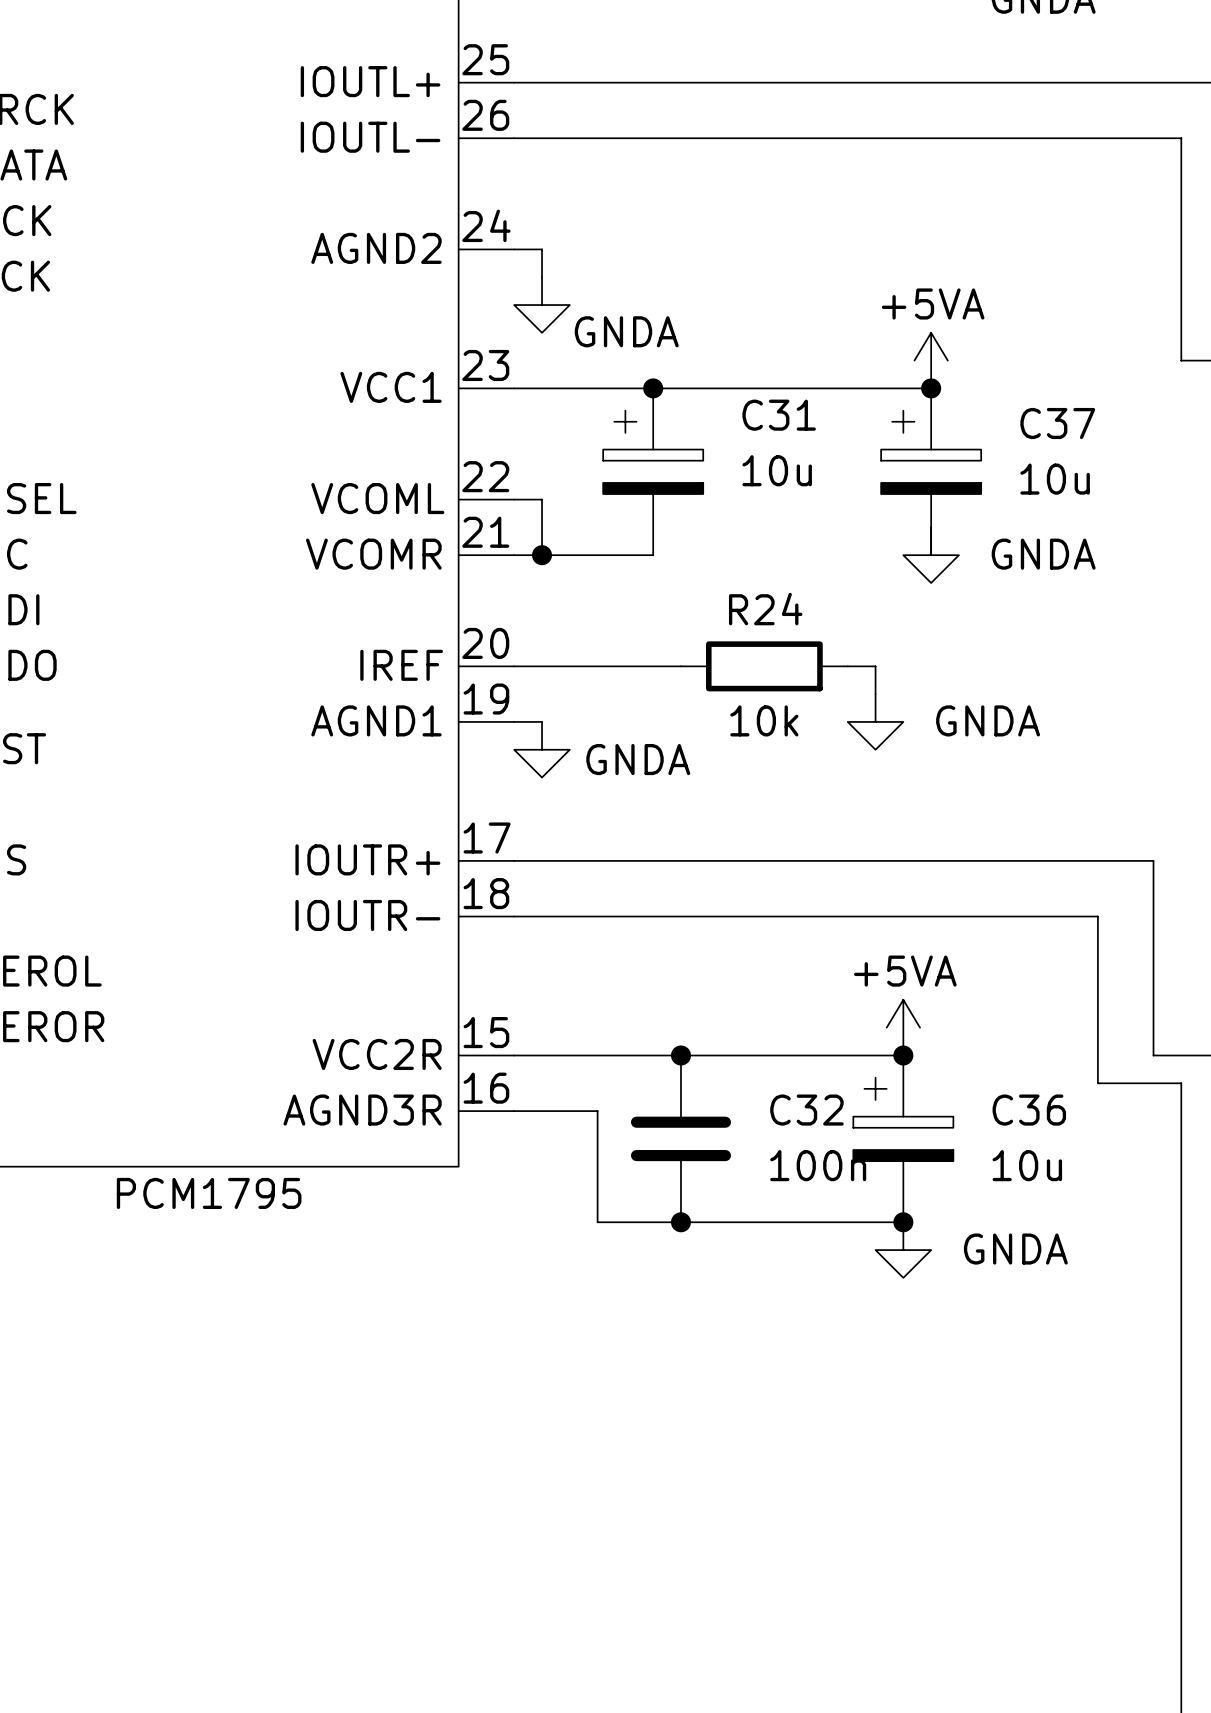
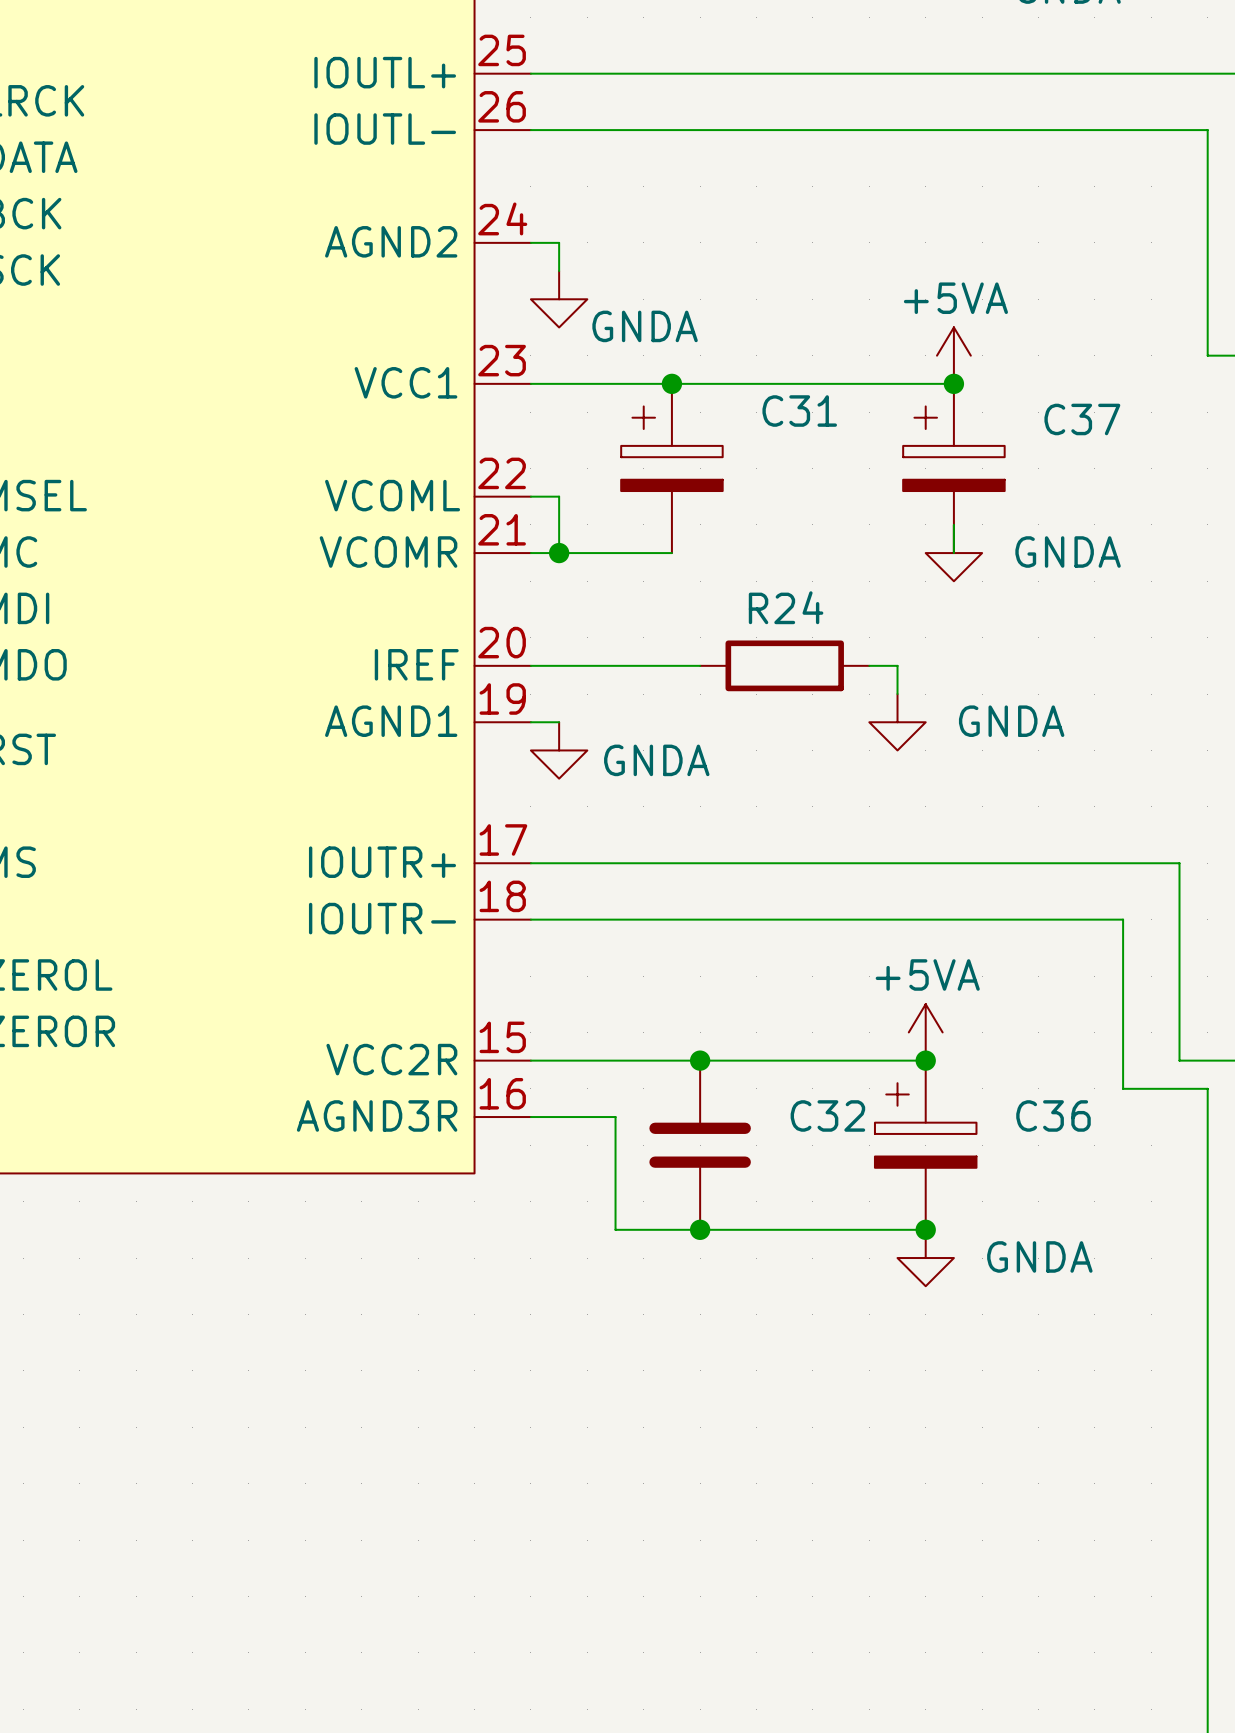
C31 value: 10u (777, 470) -> none
C37 value: 10u (1055, 479) -> none
R24 value: 10k (764, 720) -> none
C32 value: 100n (818, 1165) -> none
C36 value: 10u (1027, 1165) -> none
part value: PCM1795 (209, 1193) -> none

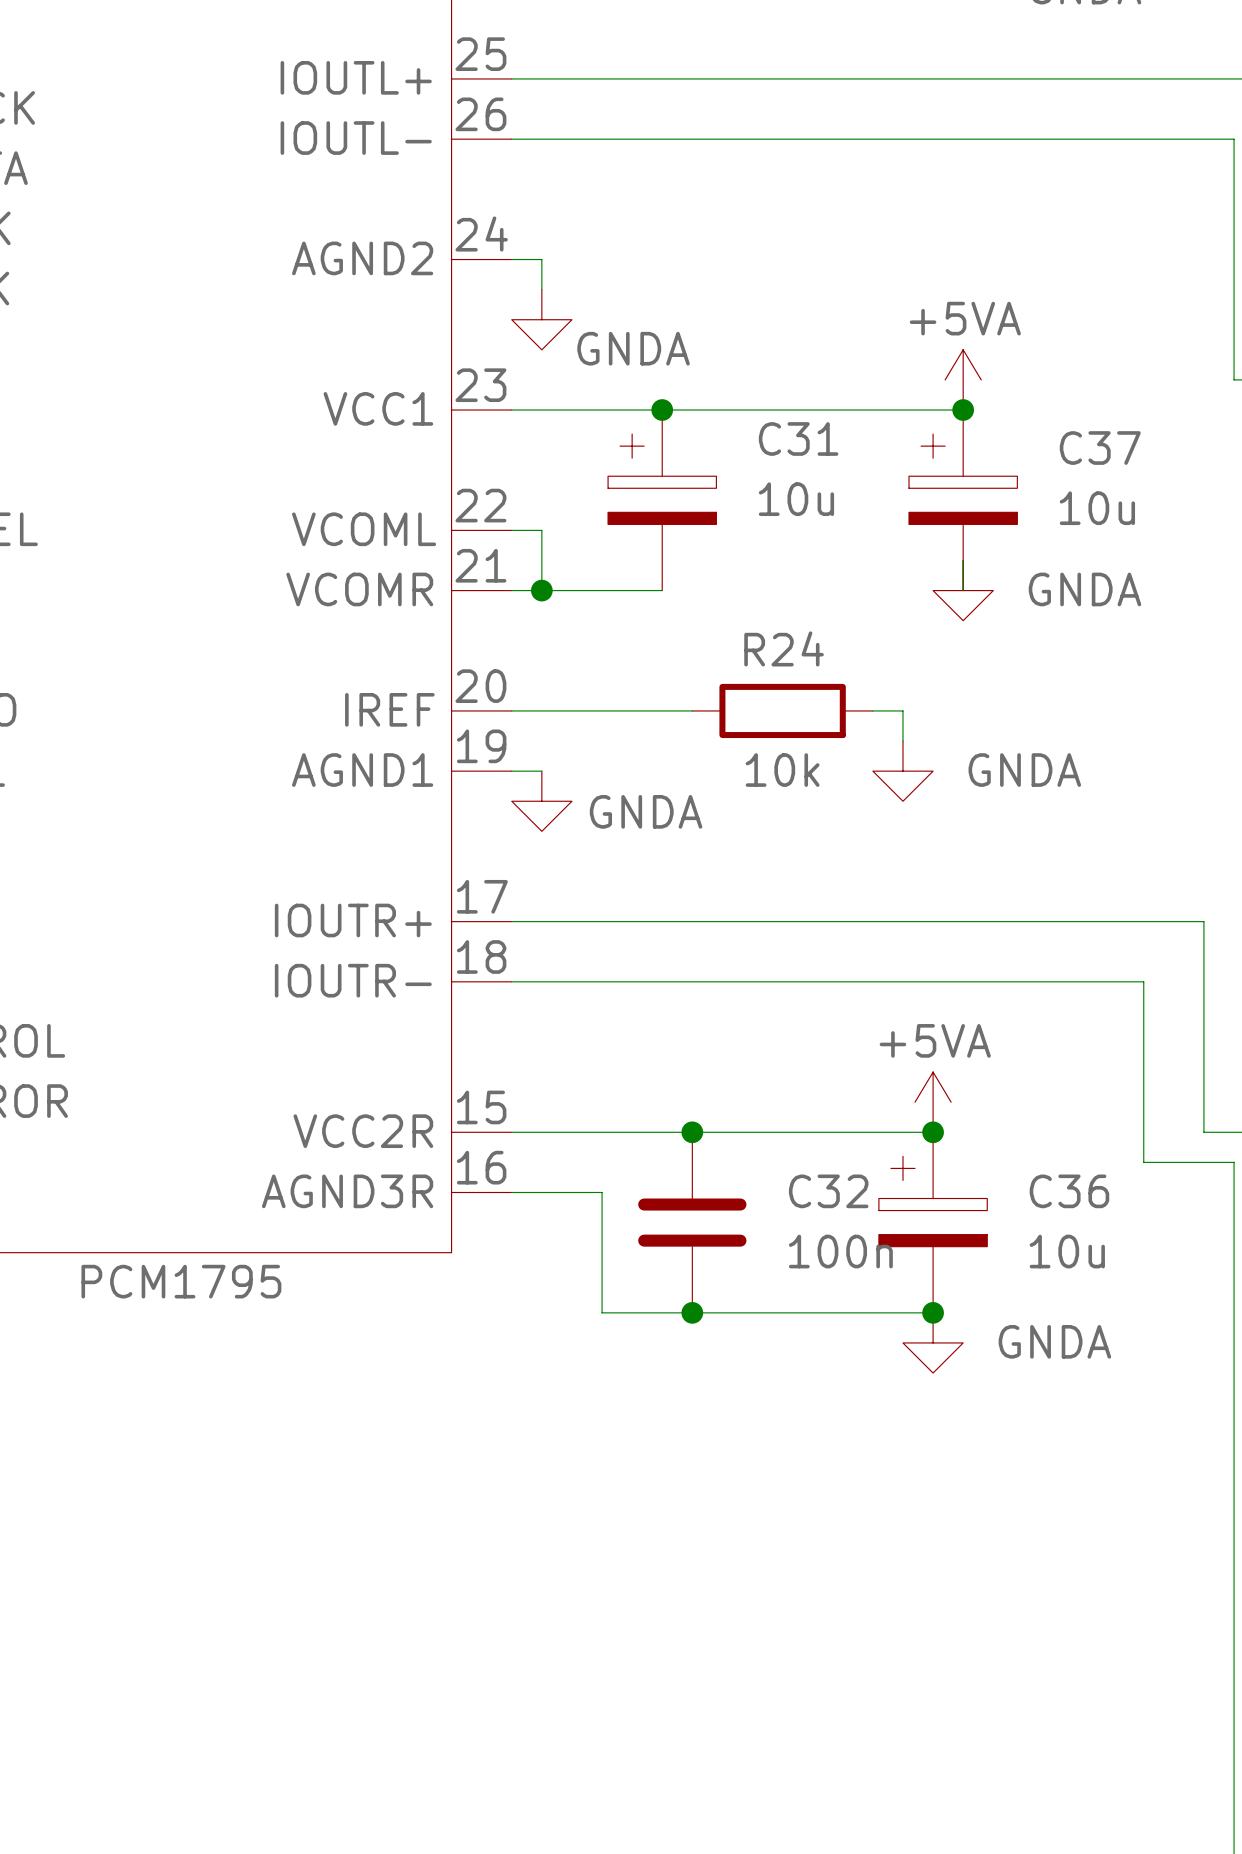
C31 value: none -> 10u (796, 499)
C37 value: none -> 10u (1097, 508)
R24 value: none -> 10k (782, 770)
C32 value: none -> 100n (840, 1251)
C36 value: none -> 10u (1067, 1251)
part value: none -> PCM1795 (181, 1281)

